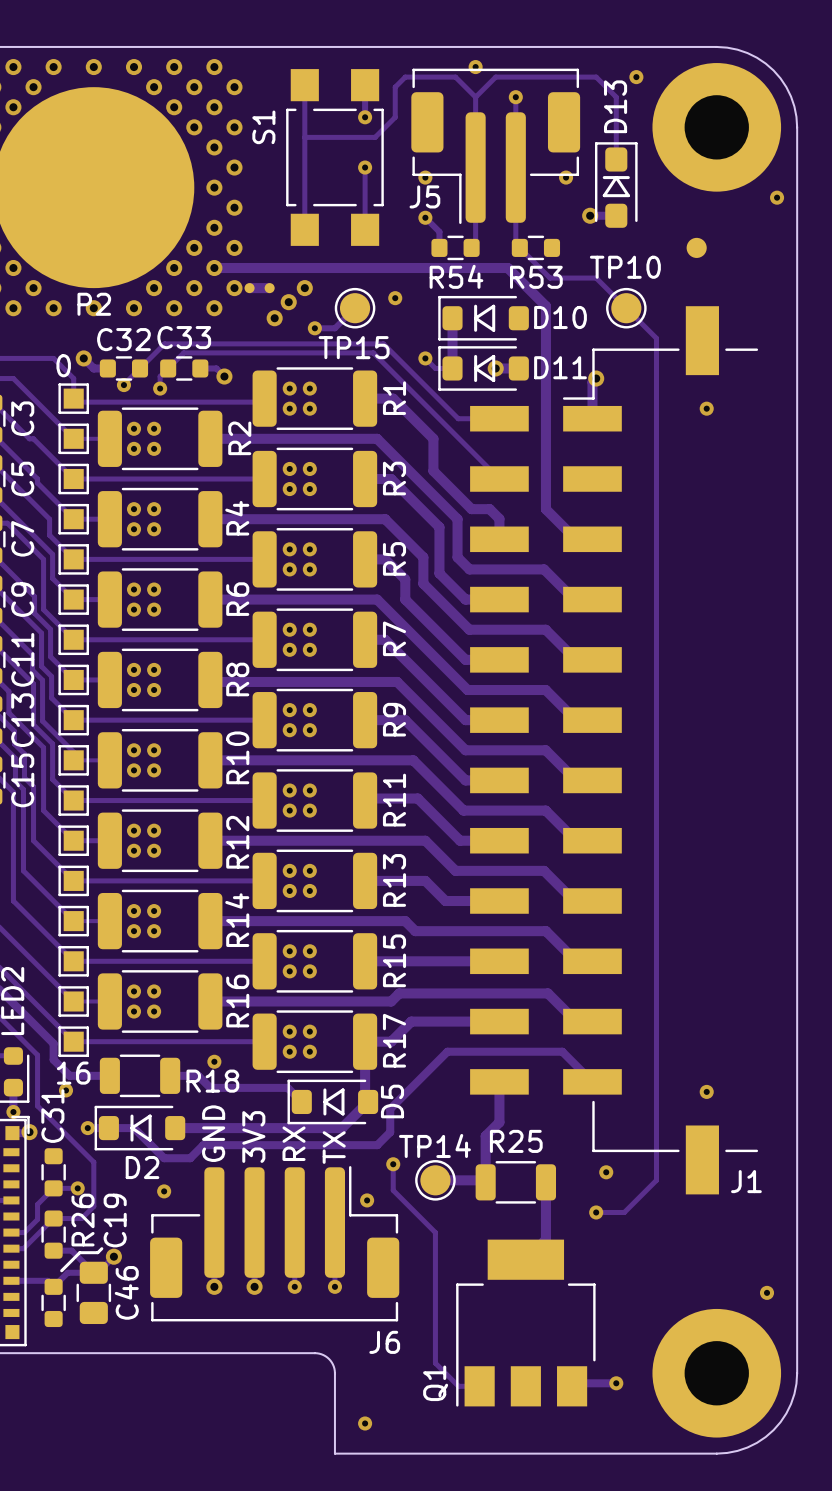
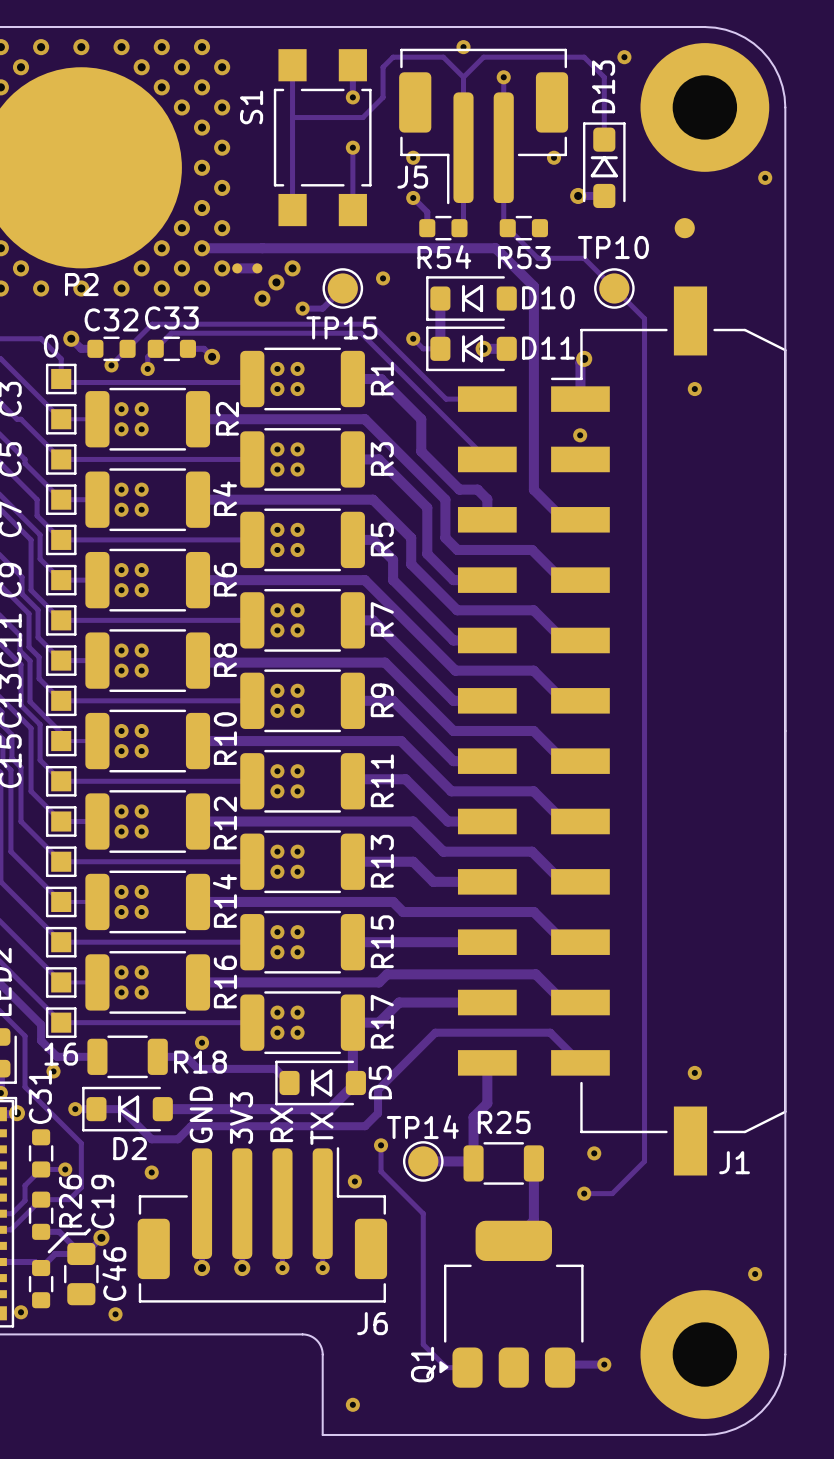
J1 footprint: [470, 306, 759, 1195] -> [457, 286, 787, 1176]
via: none -> (580, 435)
Q1 footprint: [456, 1239, 596, 1407] -> [439, 1220, 584, 1388]
via: none -> (21, 1312)
via: none -> (115, 1314)

